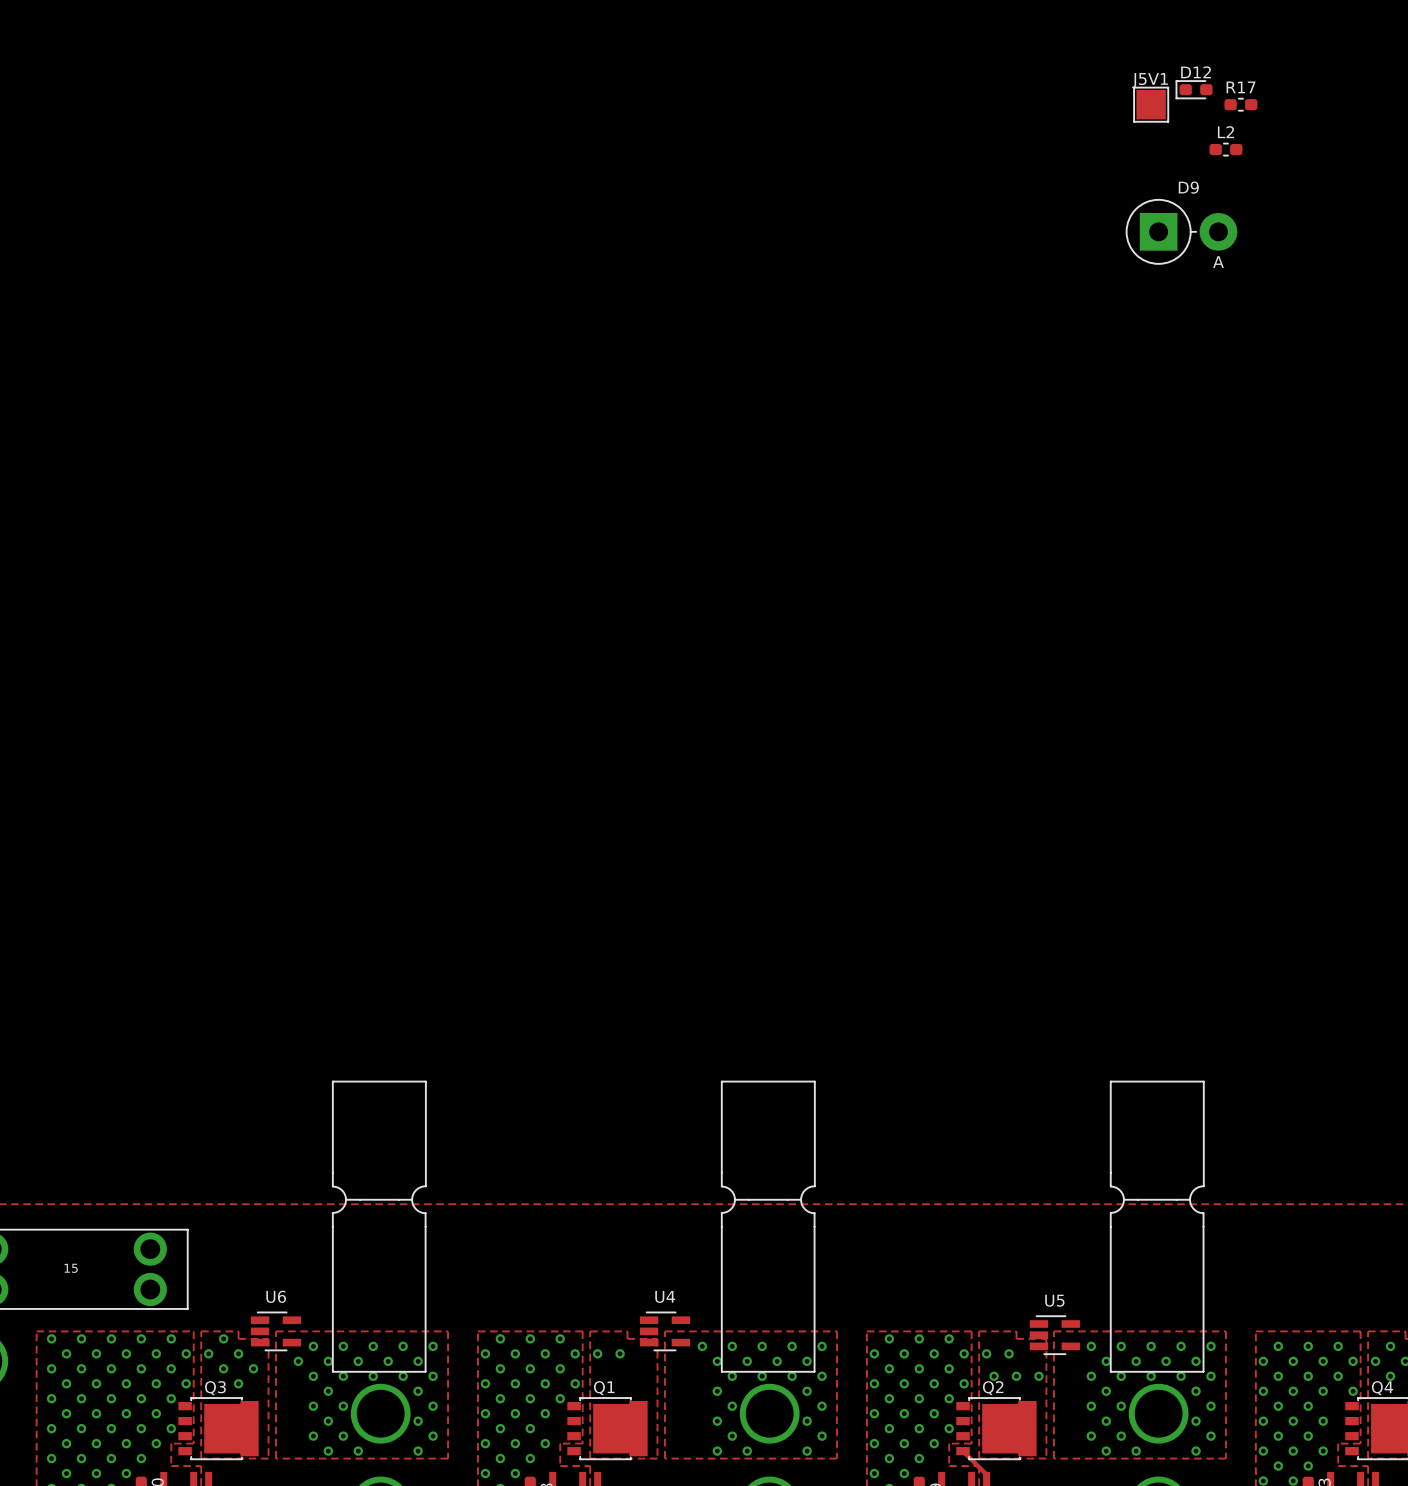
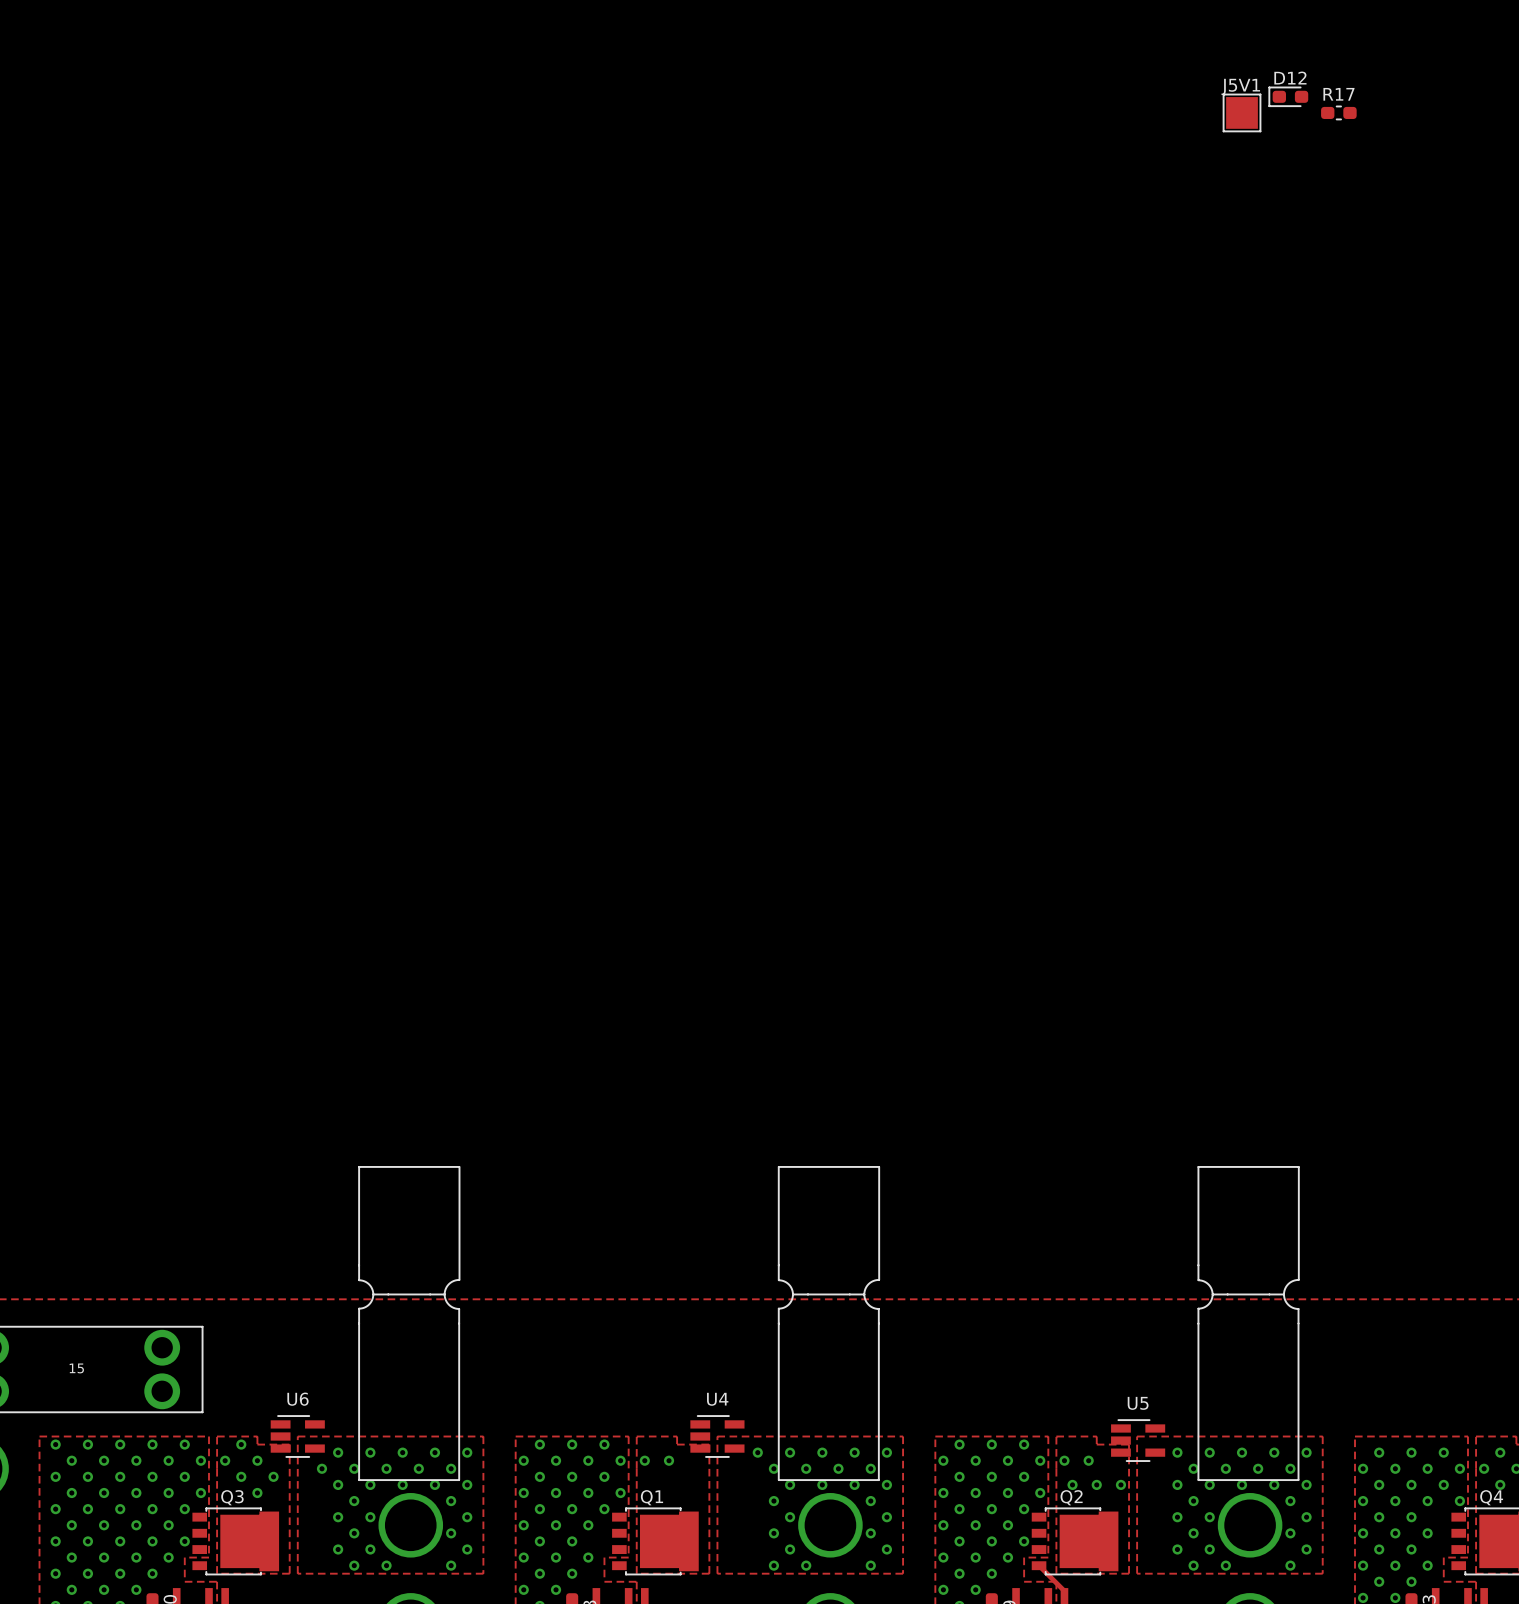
L2: (1225, 149) -> none
D9: (1181, 231) -> none

